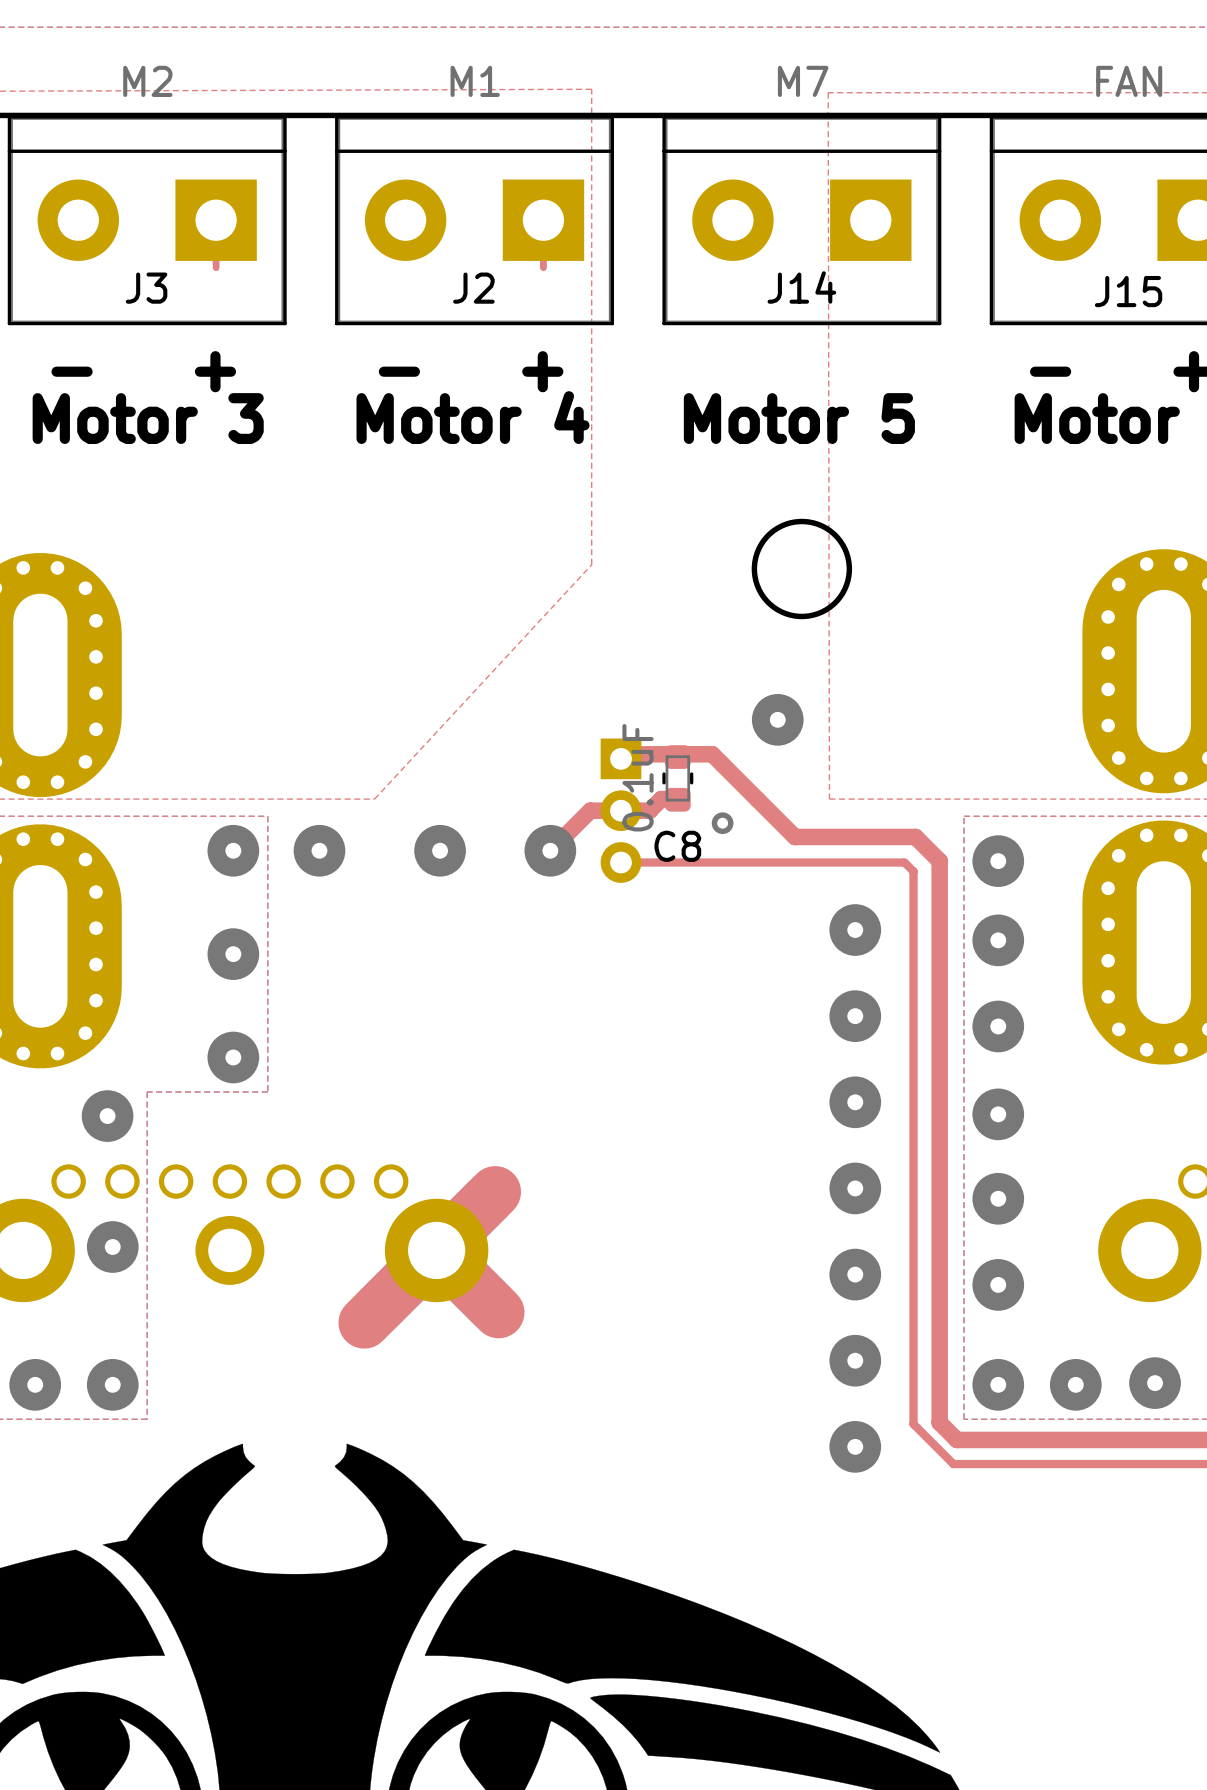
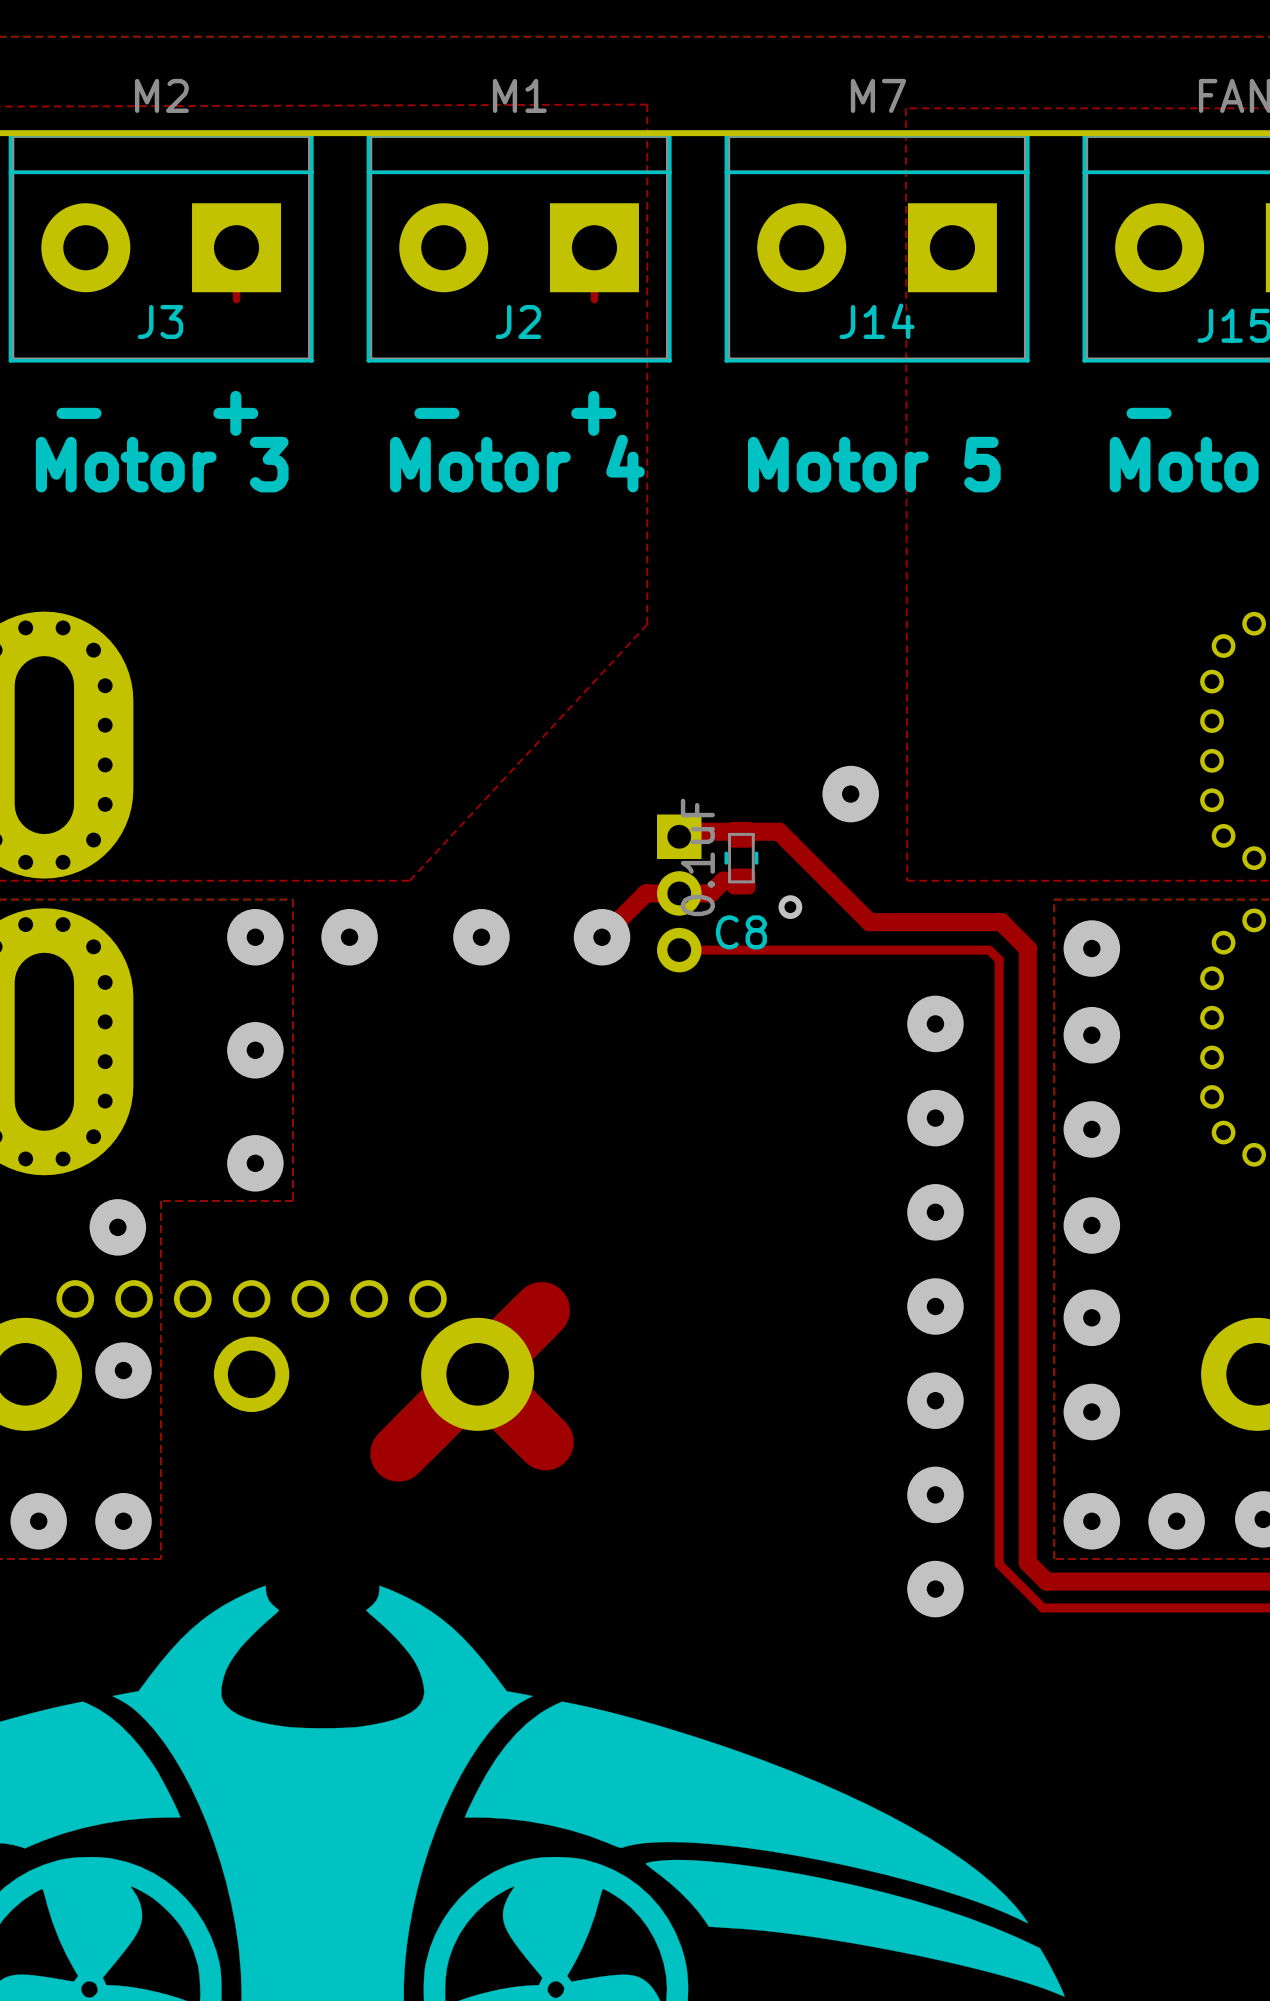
round board edge: [751, 518, 853, 620] -> none

